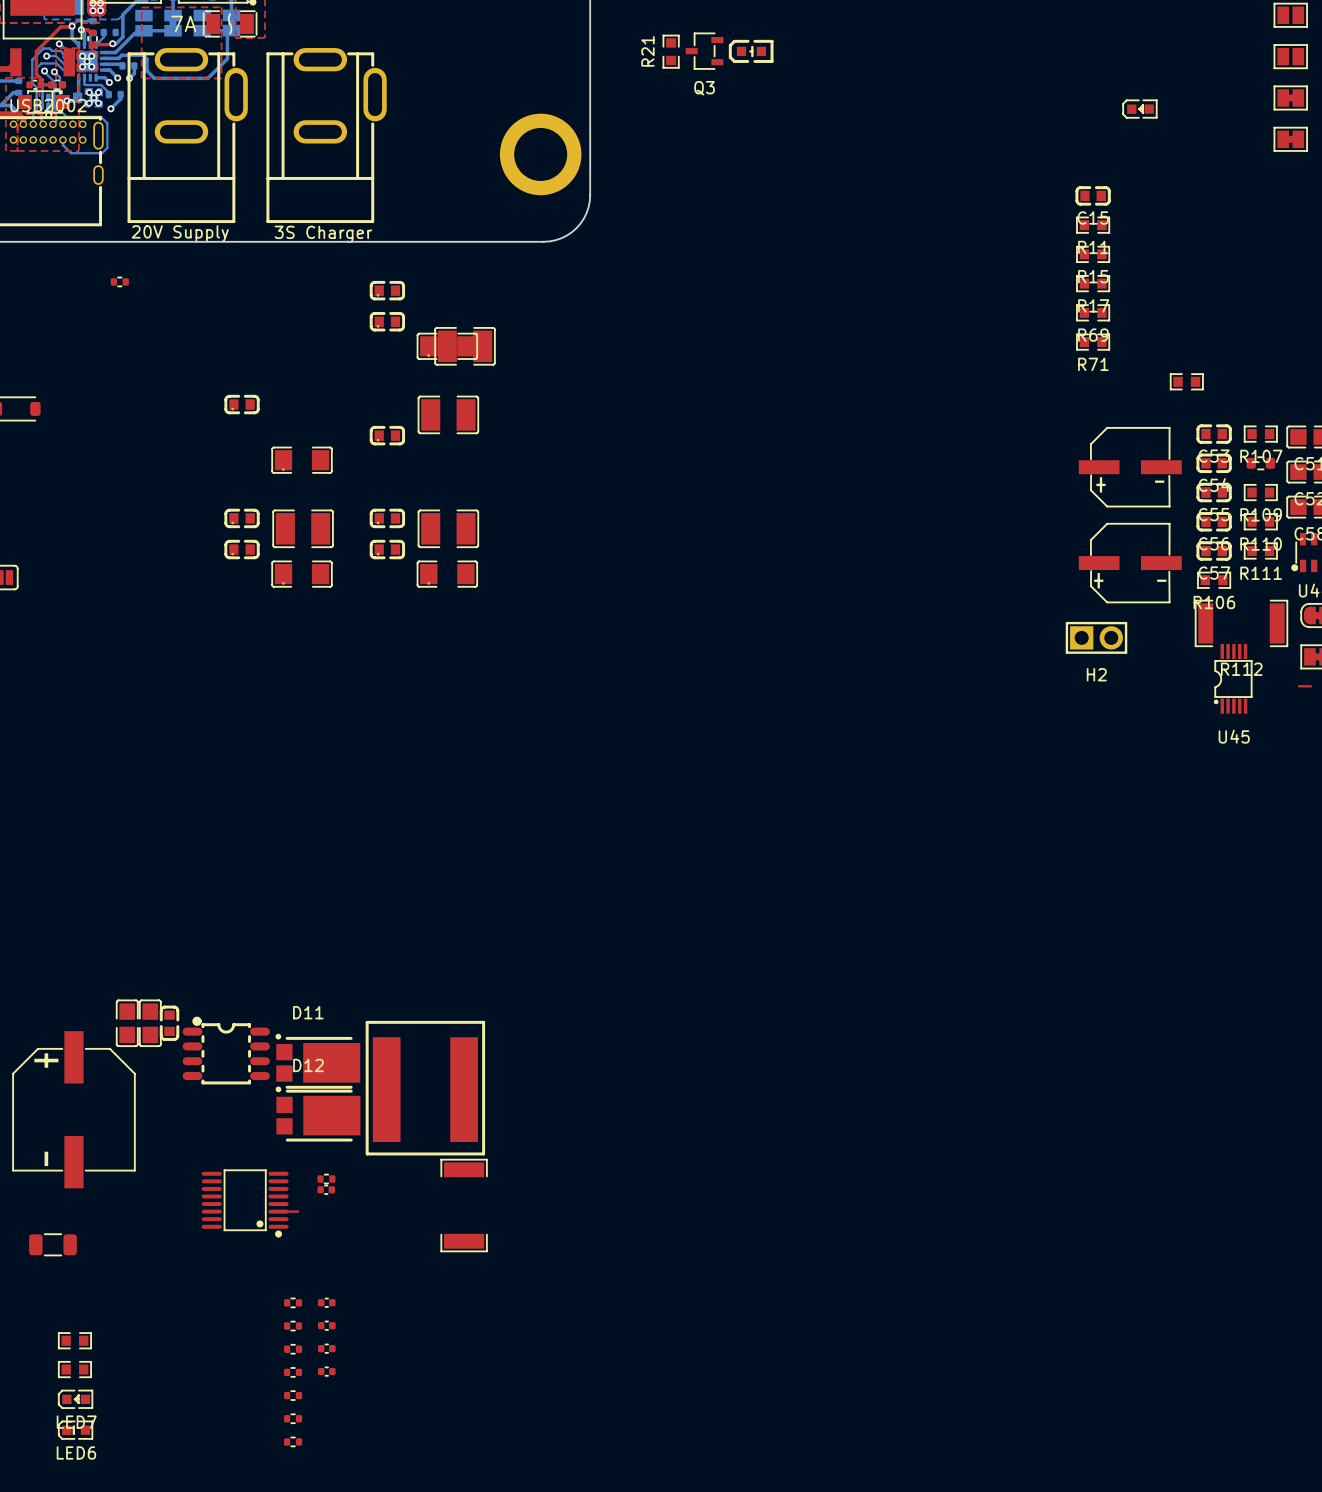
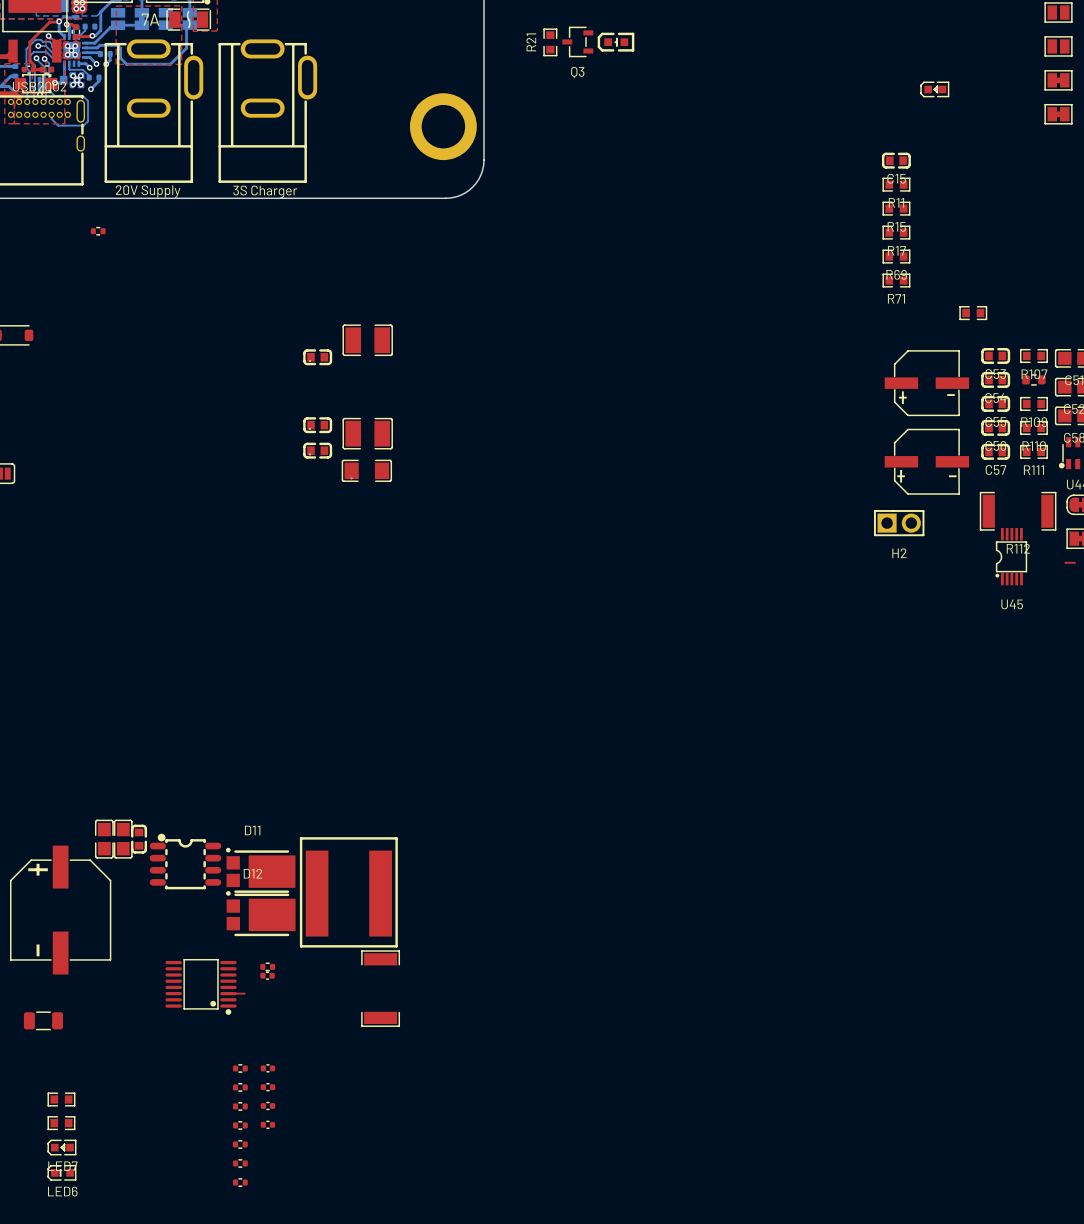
part: (387, 290) -> none
part: (387, 321) -> none
part: (447, 346) -> none
part: (465, 346) -> none
part: (242, 404) -> none
part: (302, 460) -> none
part: (242, 518) -> none
part: (303, 528) -> none
part: (242, 549) -> none
part: (302, 574) -> none
R106: (1214, 580) -> none

